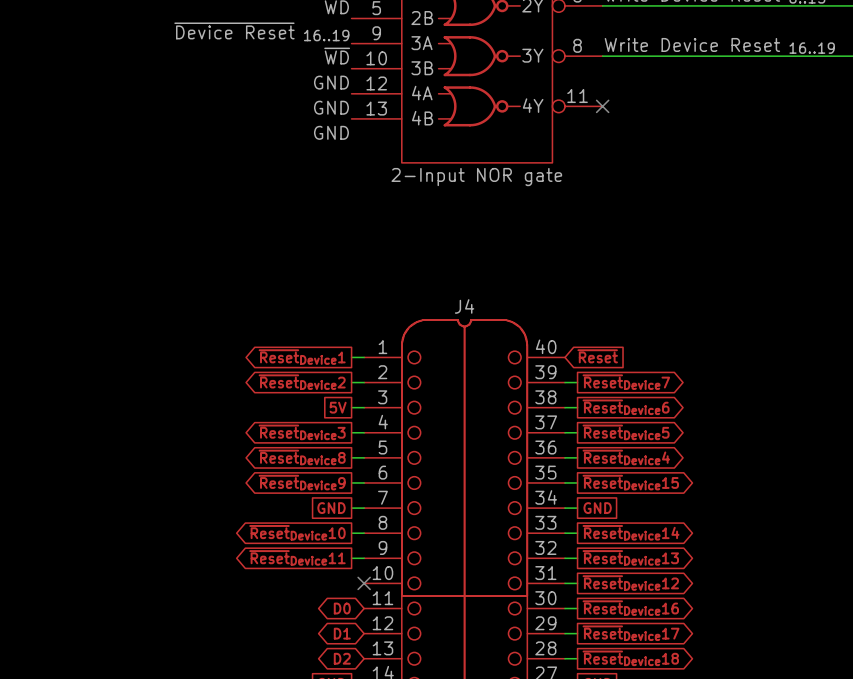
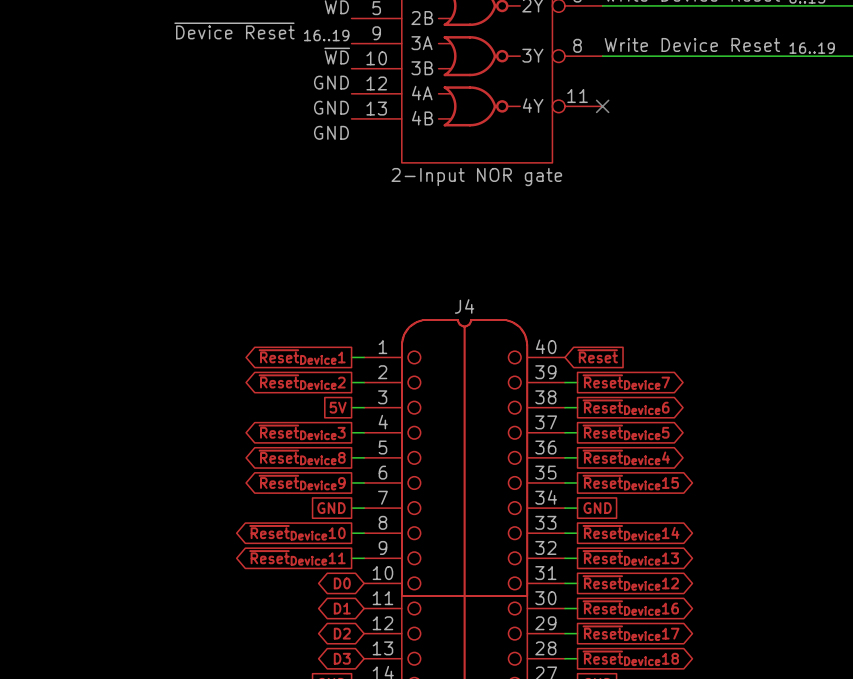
global label: none -> D0 (342, 583)
no-connect mark: (364, 583) -> none
global label: D0 (342, 608) -> D1 (342, 608)
global label: D1 (342, 633) -> D2 (342, 633)
global label: D2 (342, 658) -> D3 (342, 658)

